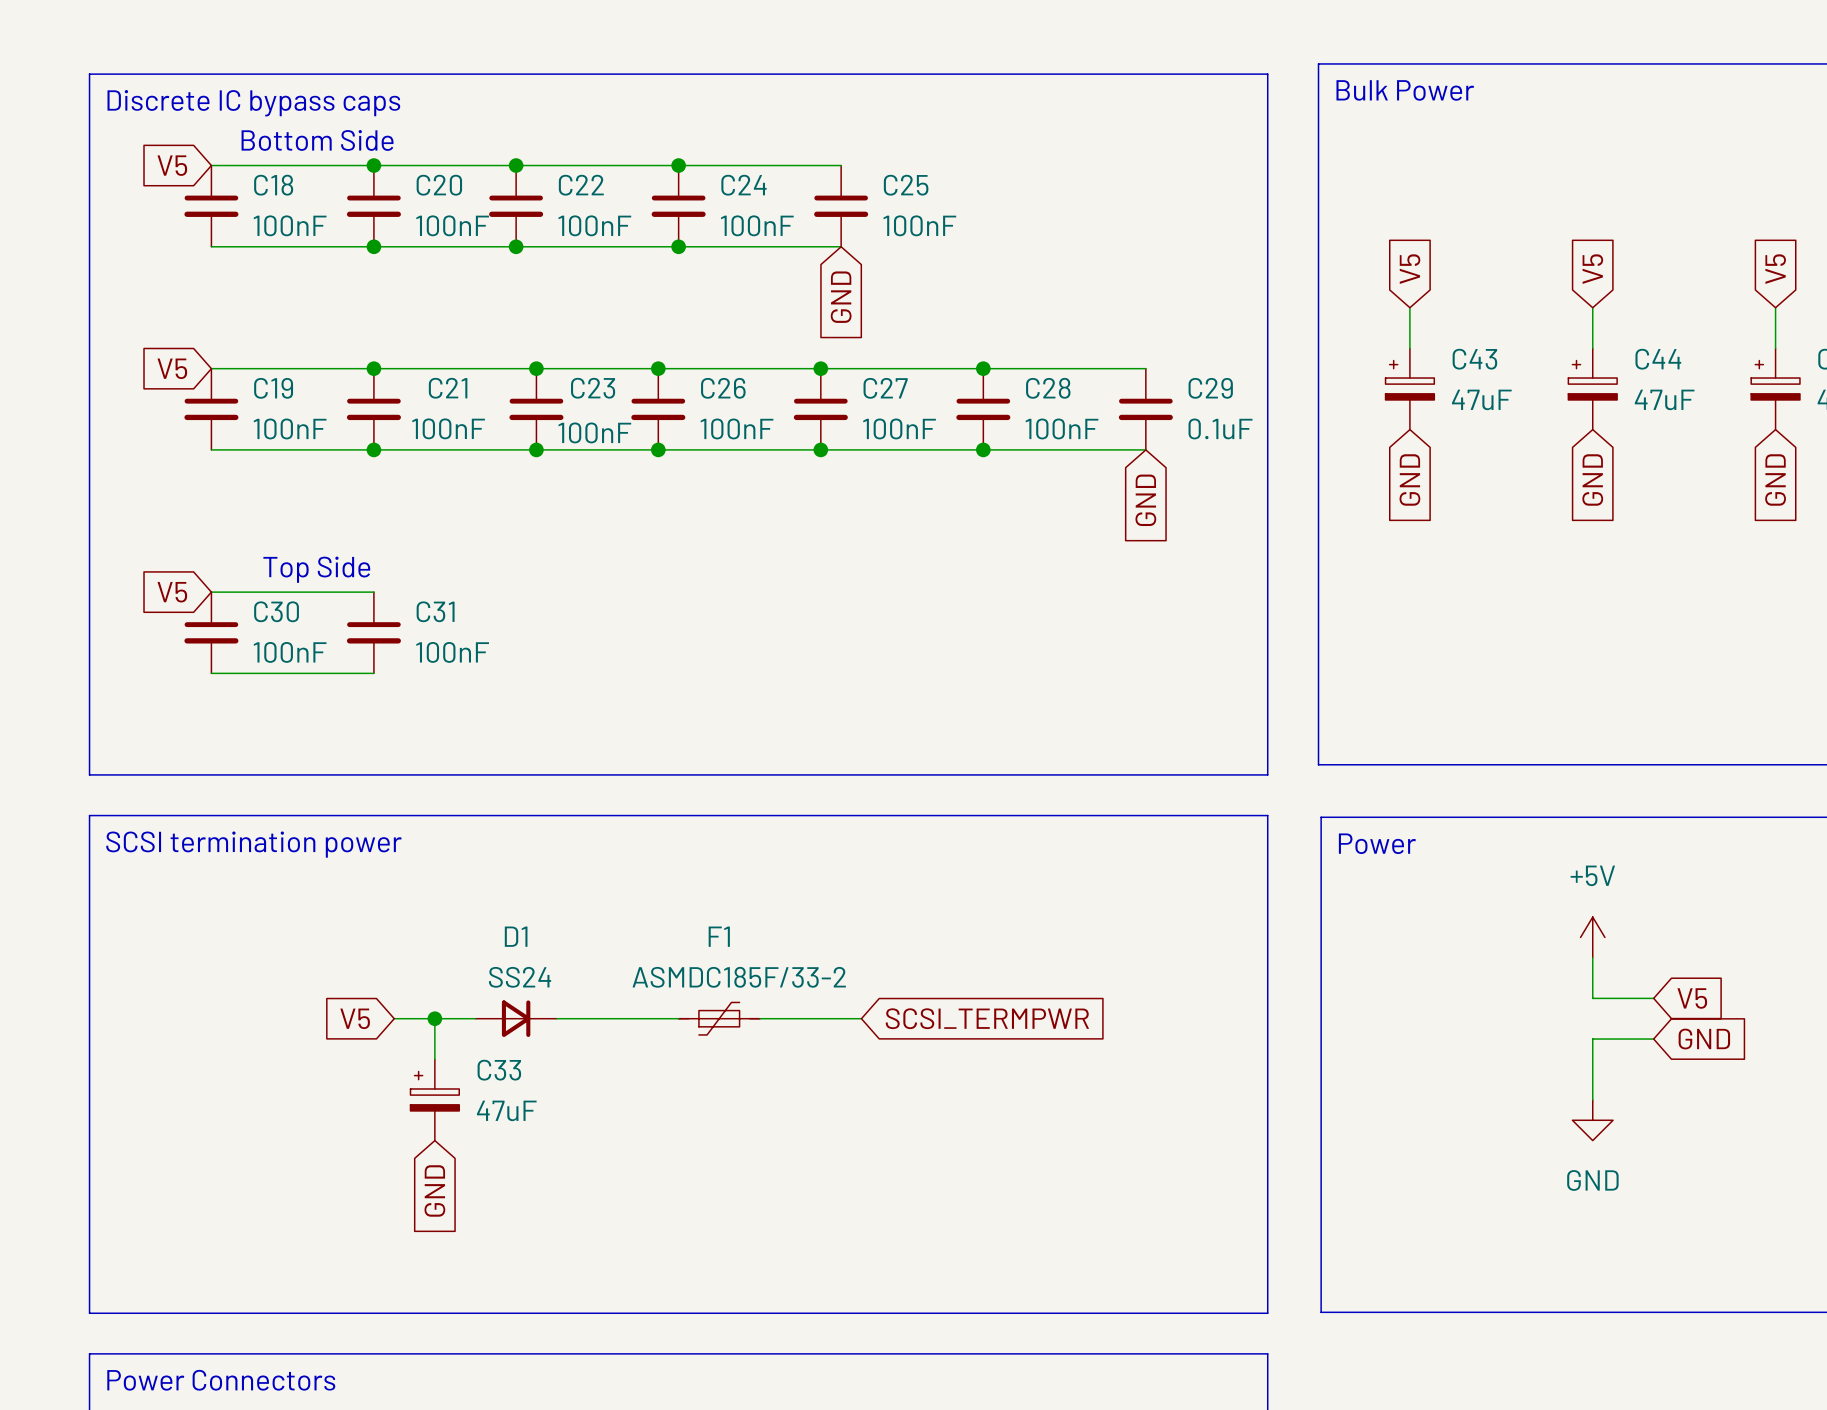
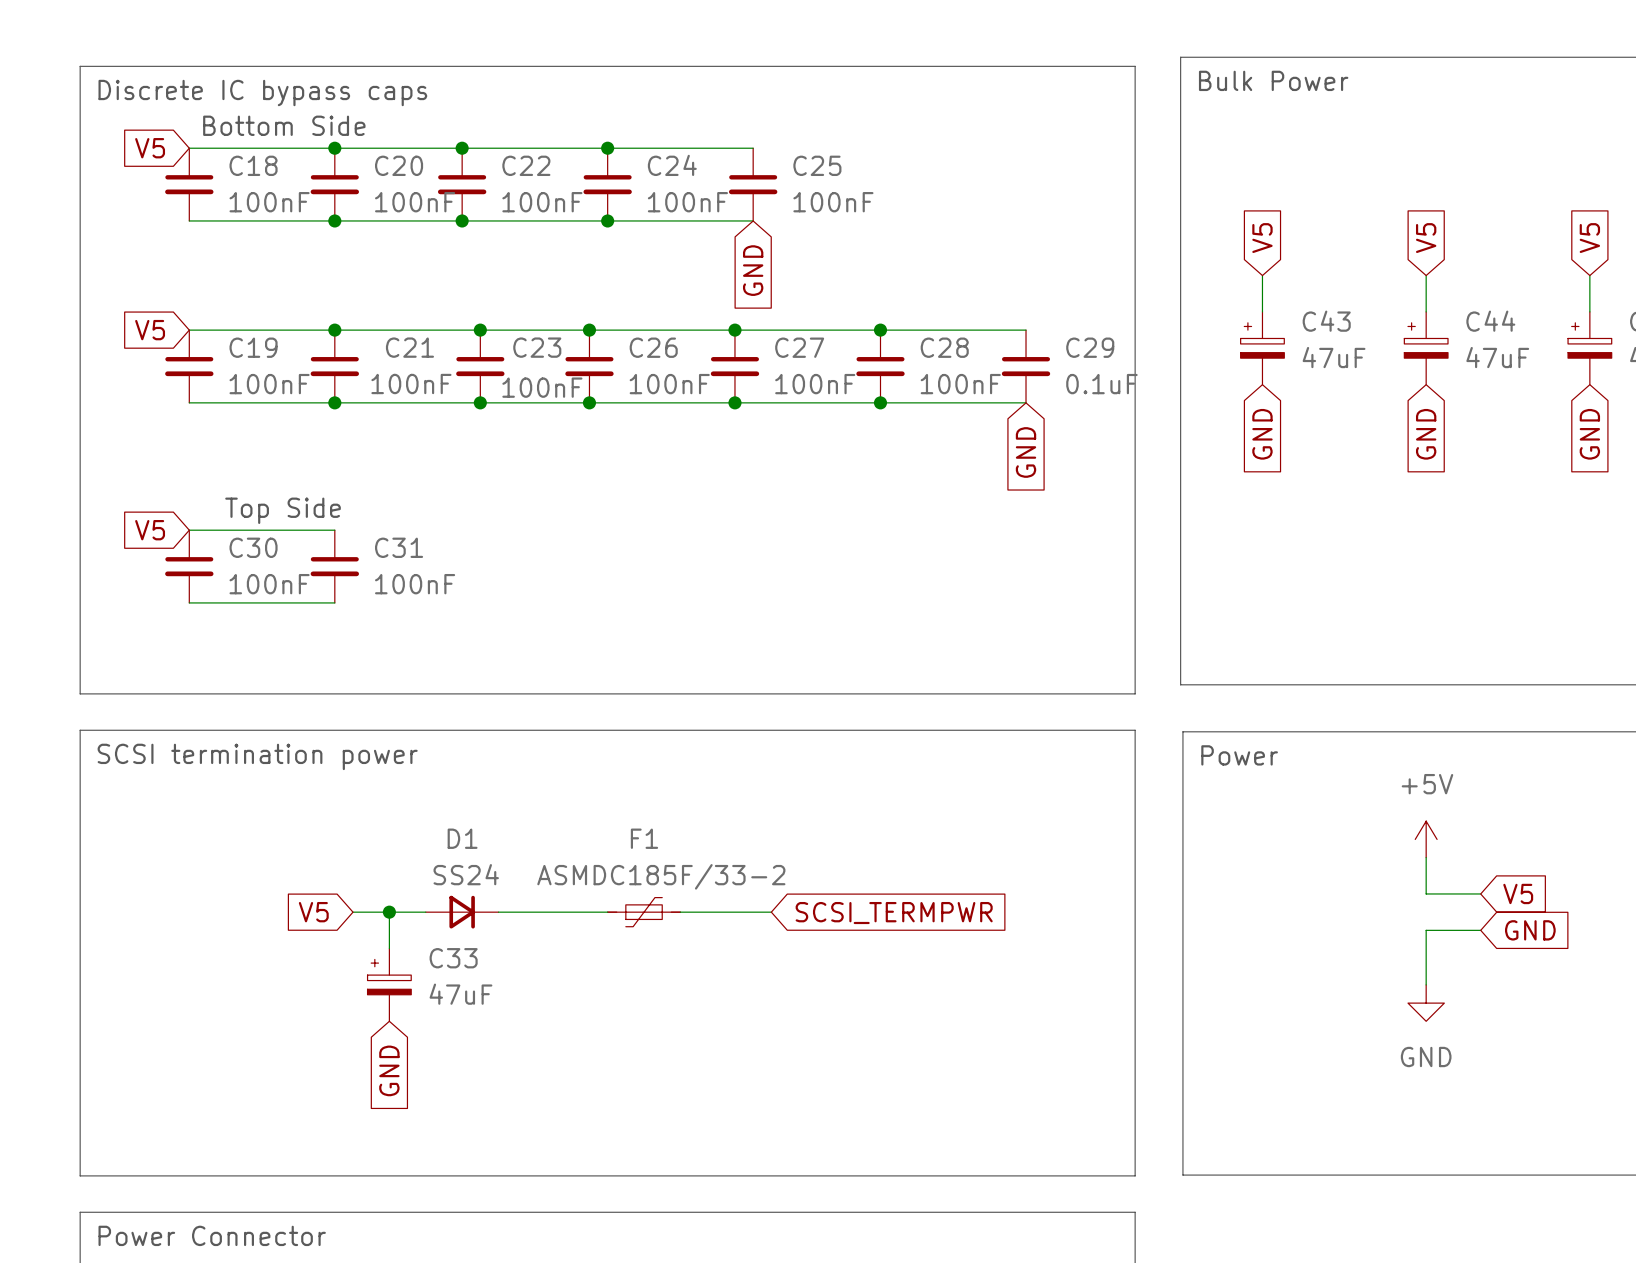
text: Power Connectors (221, 1380) -> Power Connector (212, 1235)

